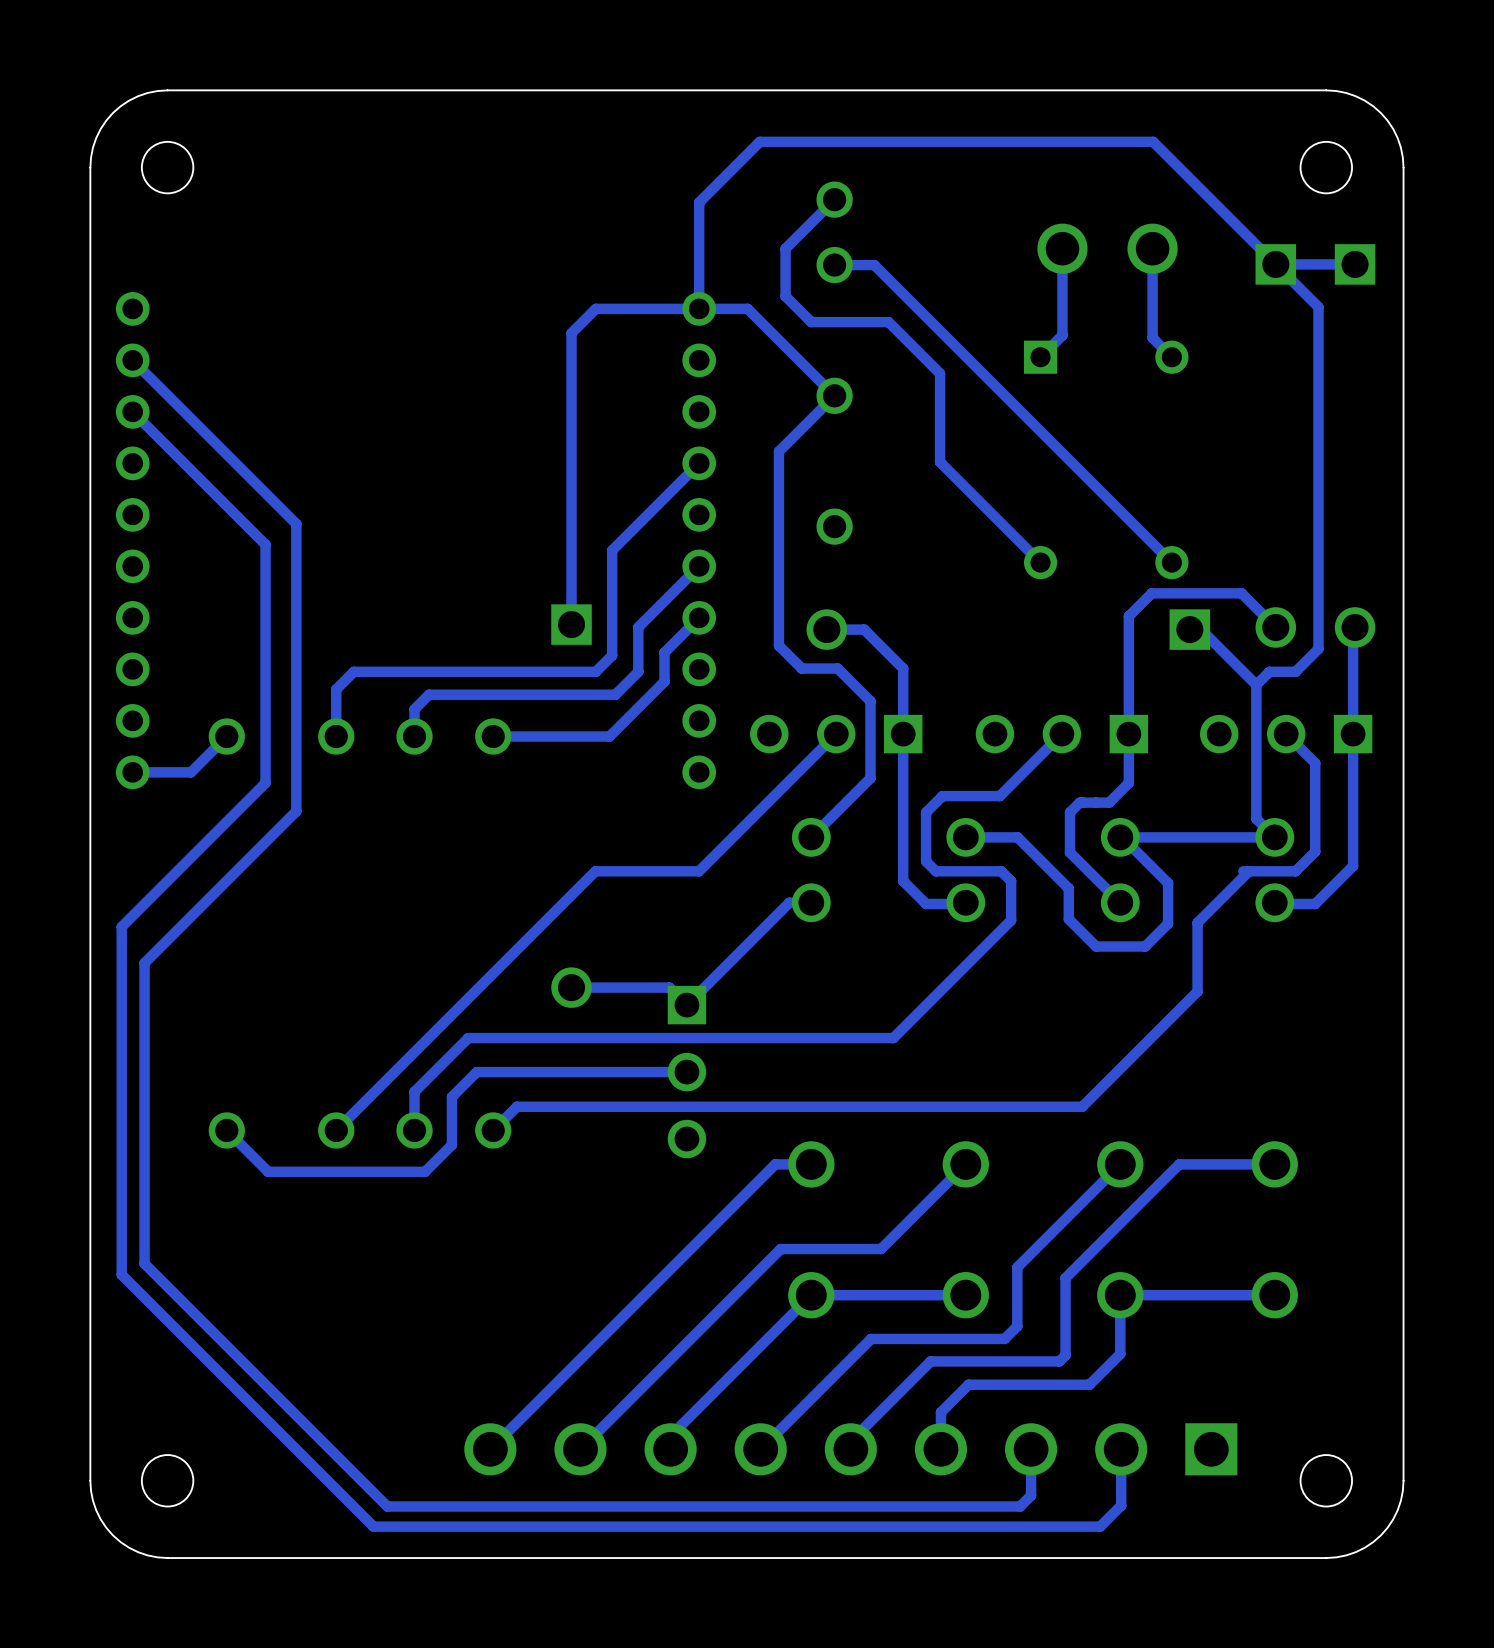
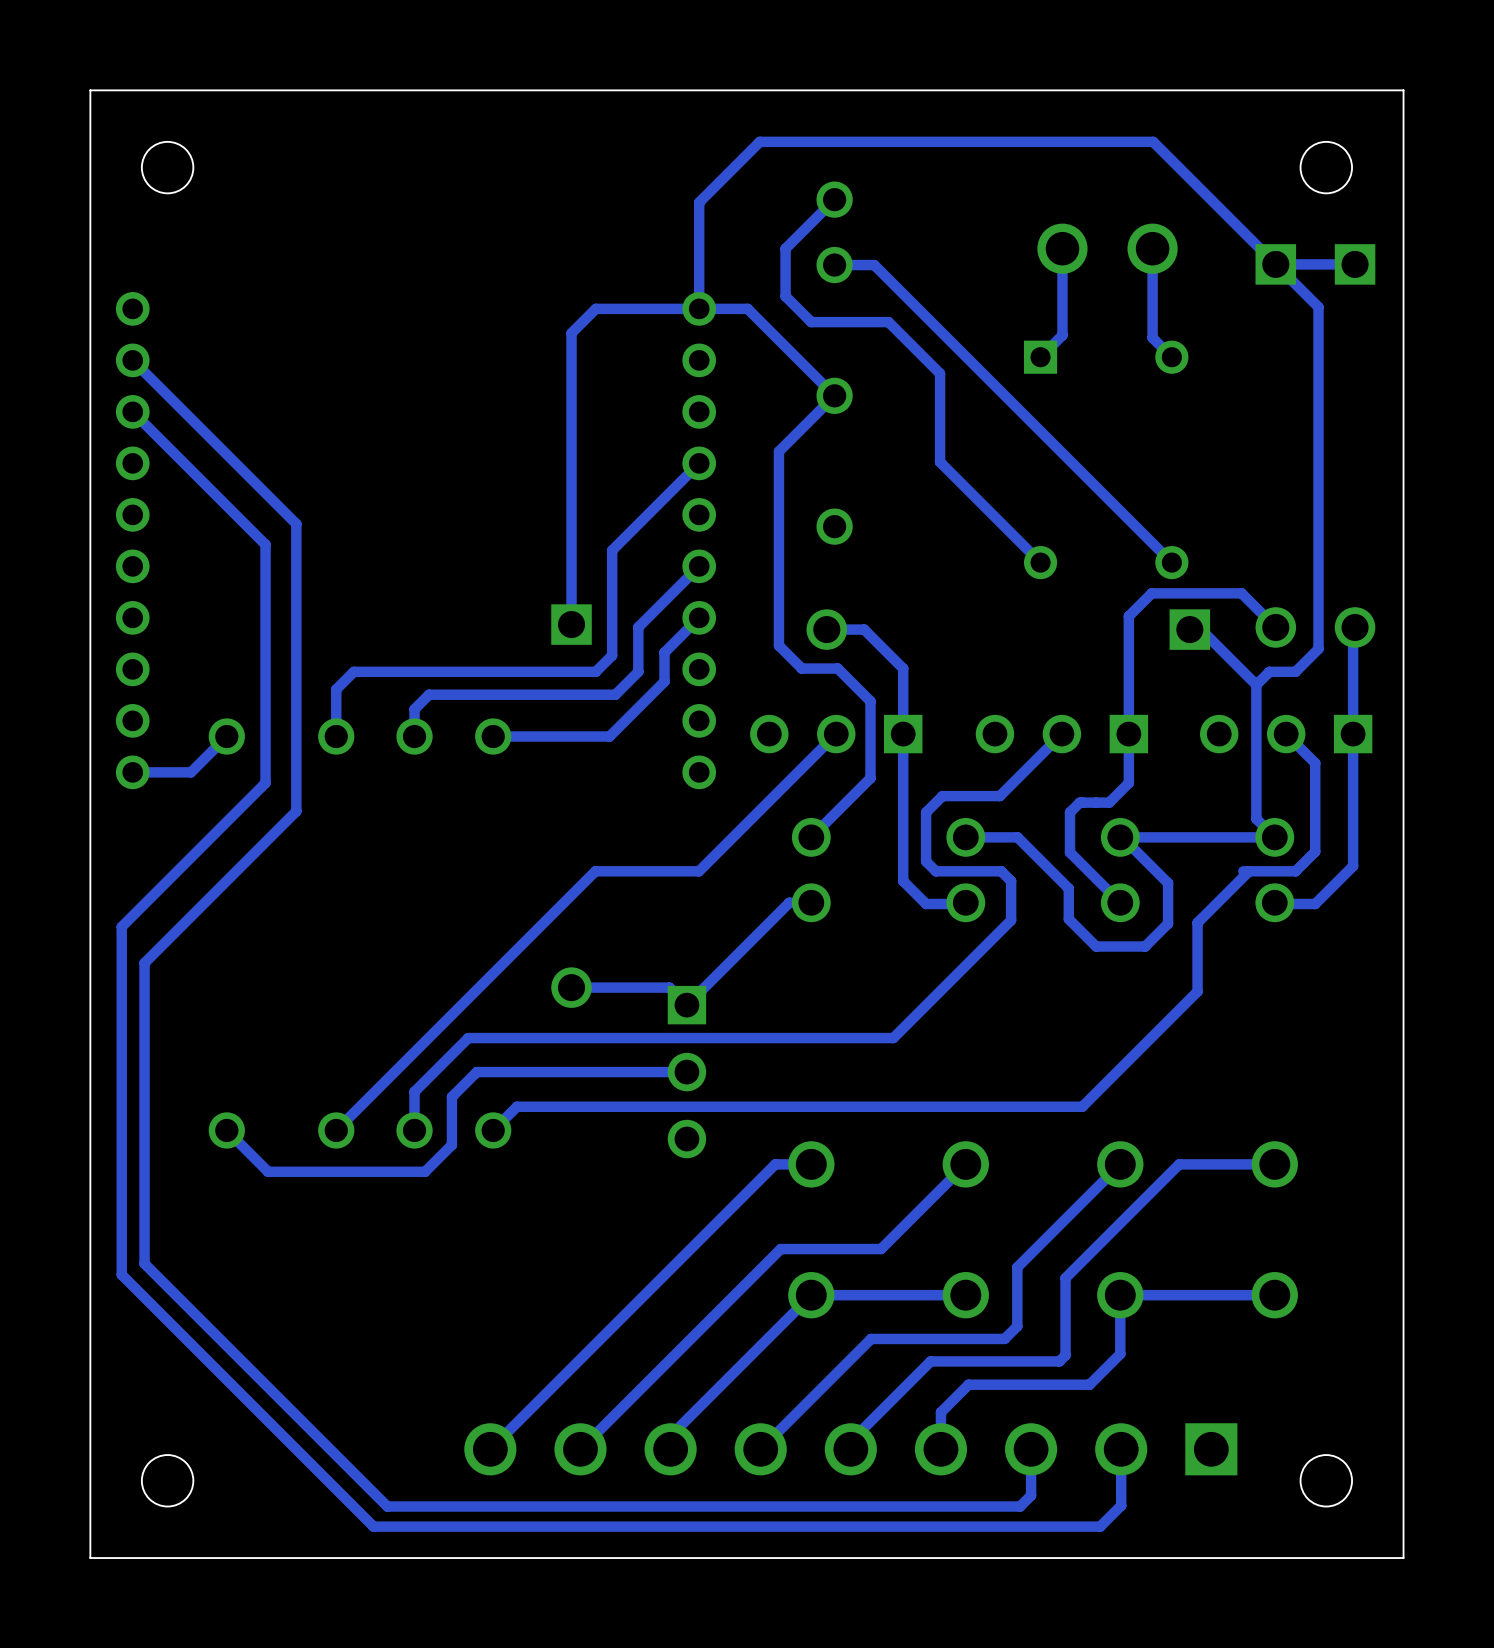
board edge: (167, 90) (138, 96) (112, 112) (96, 138) (90, 167) -> (167, 90) (90, 90) (90, 167)
board edge: (1326, 90) (1355, 96) (1380, 112) (1397, 138) (1403, 167) -> (1326, 90) (1403, 90) (1403, 167)
board edge: (90, 1480) (96, 1510) (112, 1535) (138, 1552) (167, 1558) -> (90, 1480) (90, 1558) (167, 1558)
board edge: (1403, 1480) (1397, 1510) (1380, 1535) (1355, 1552) (1326, 1558) -> (1403, 1480) (1403, 1558) (1326, 1558)

